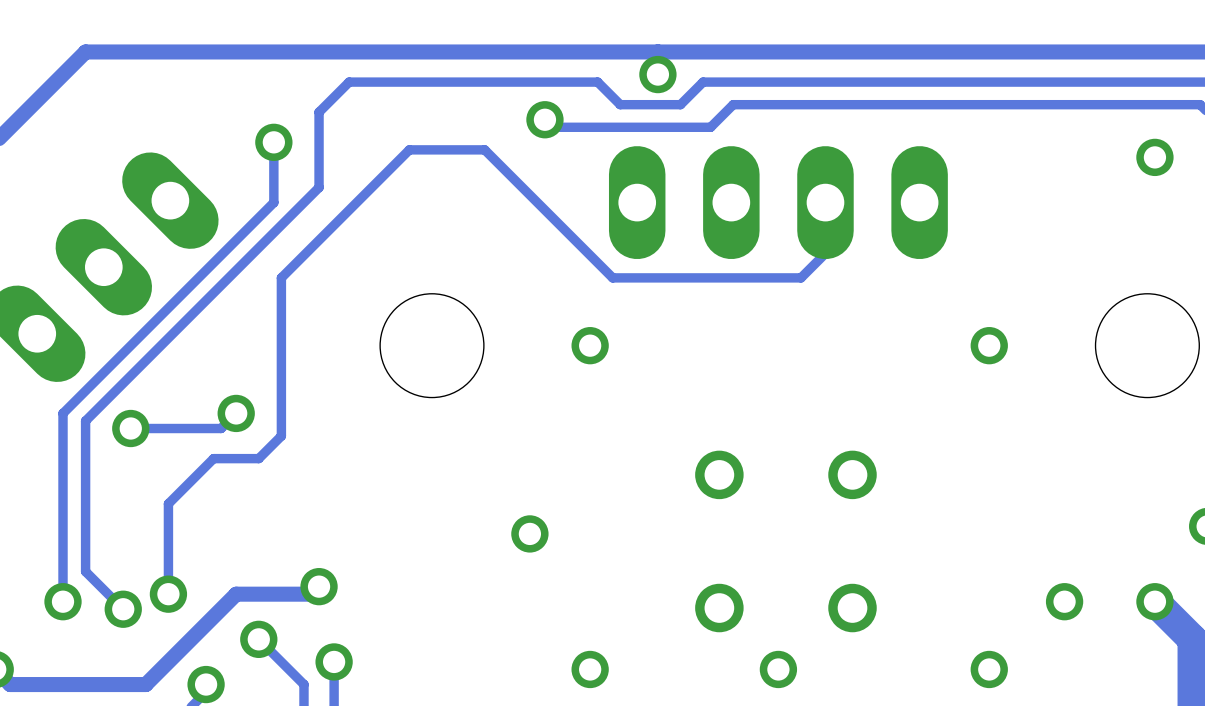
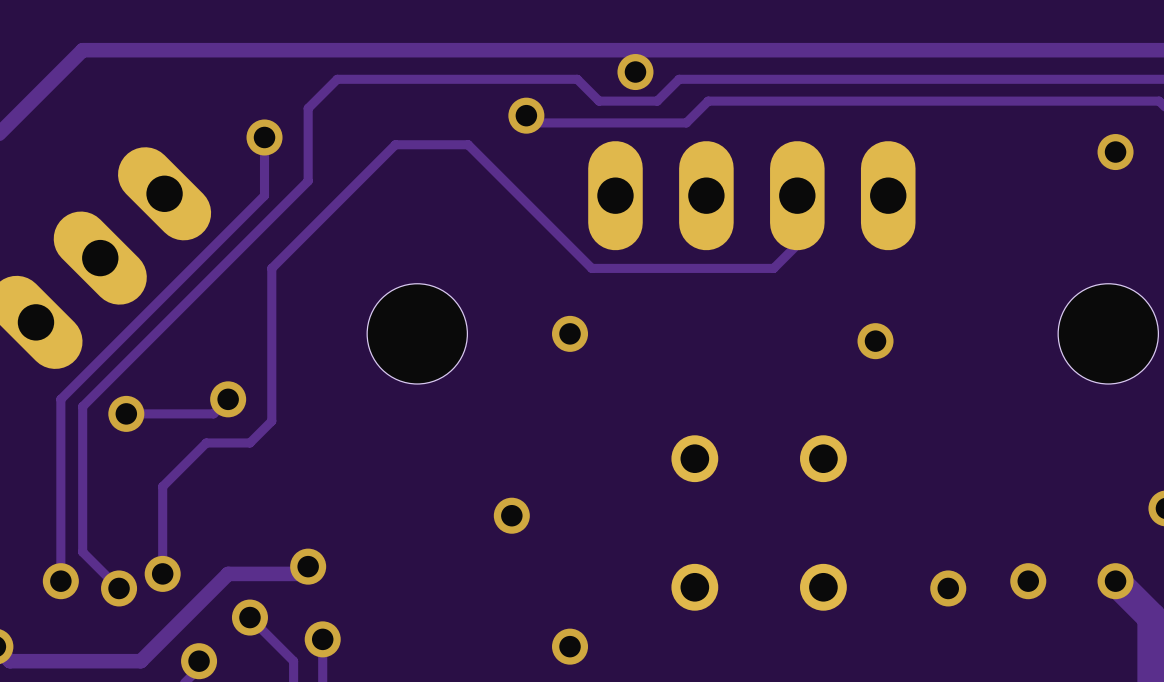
via position: (989, 345) -> (875, 341)
via: (778, 669) -> none
via position: (989, 669) -> (948, 588)

